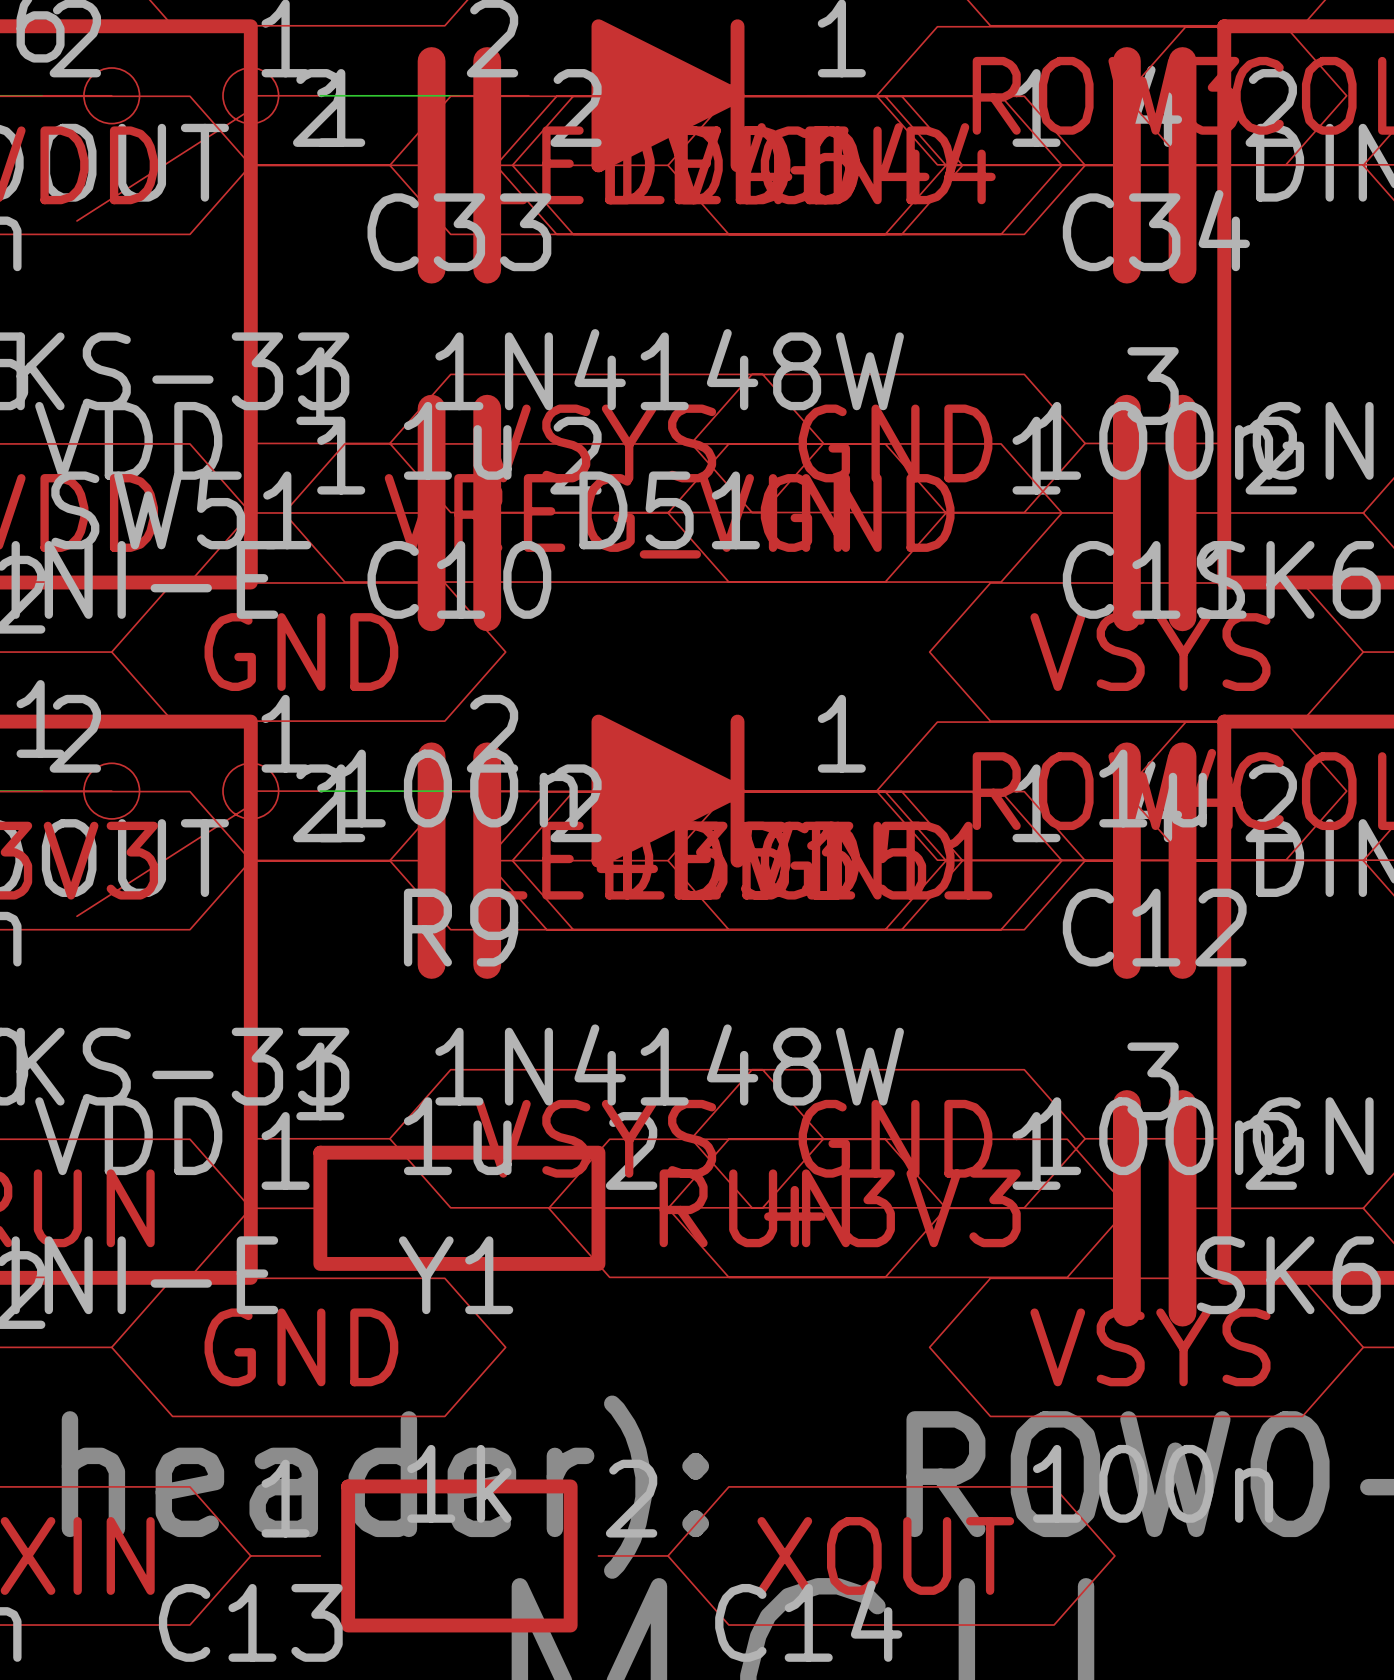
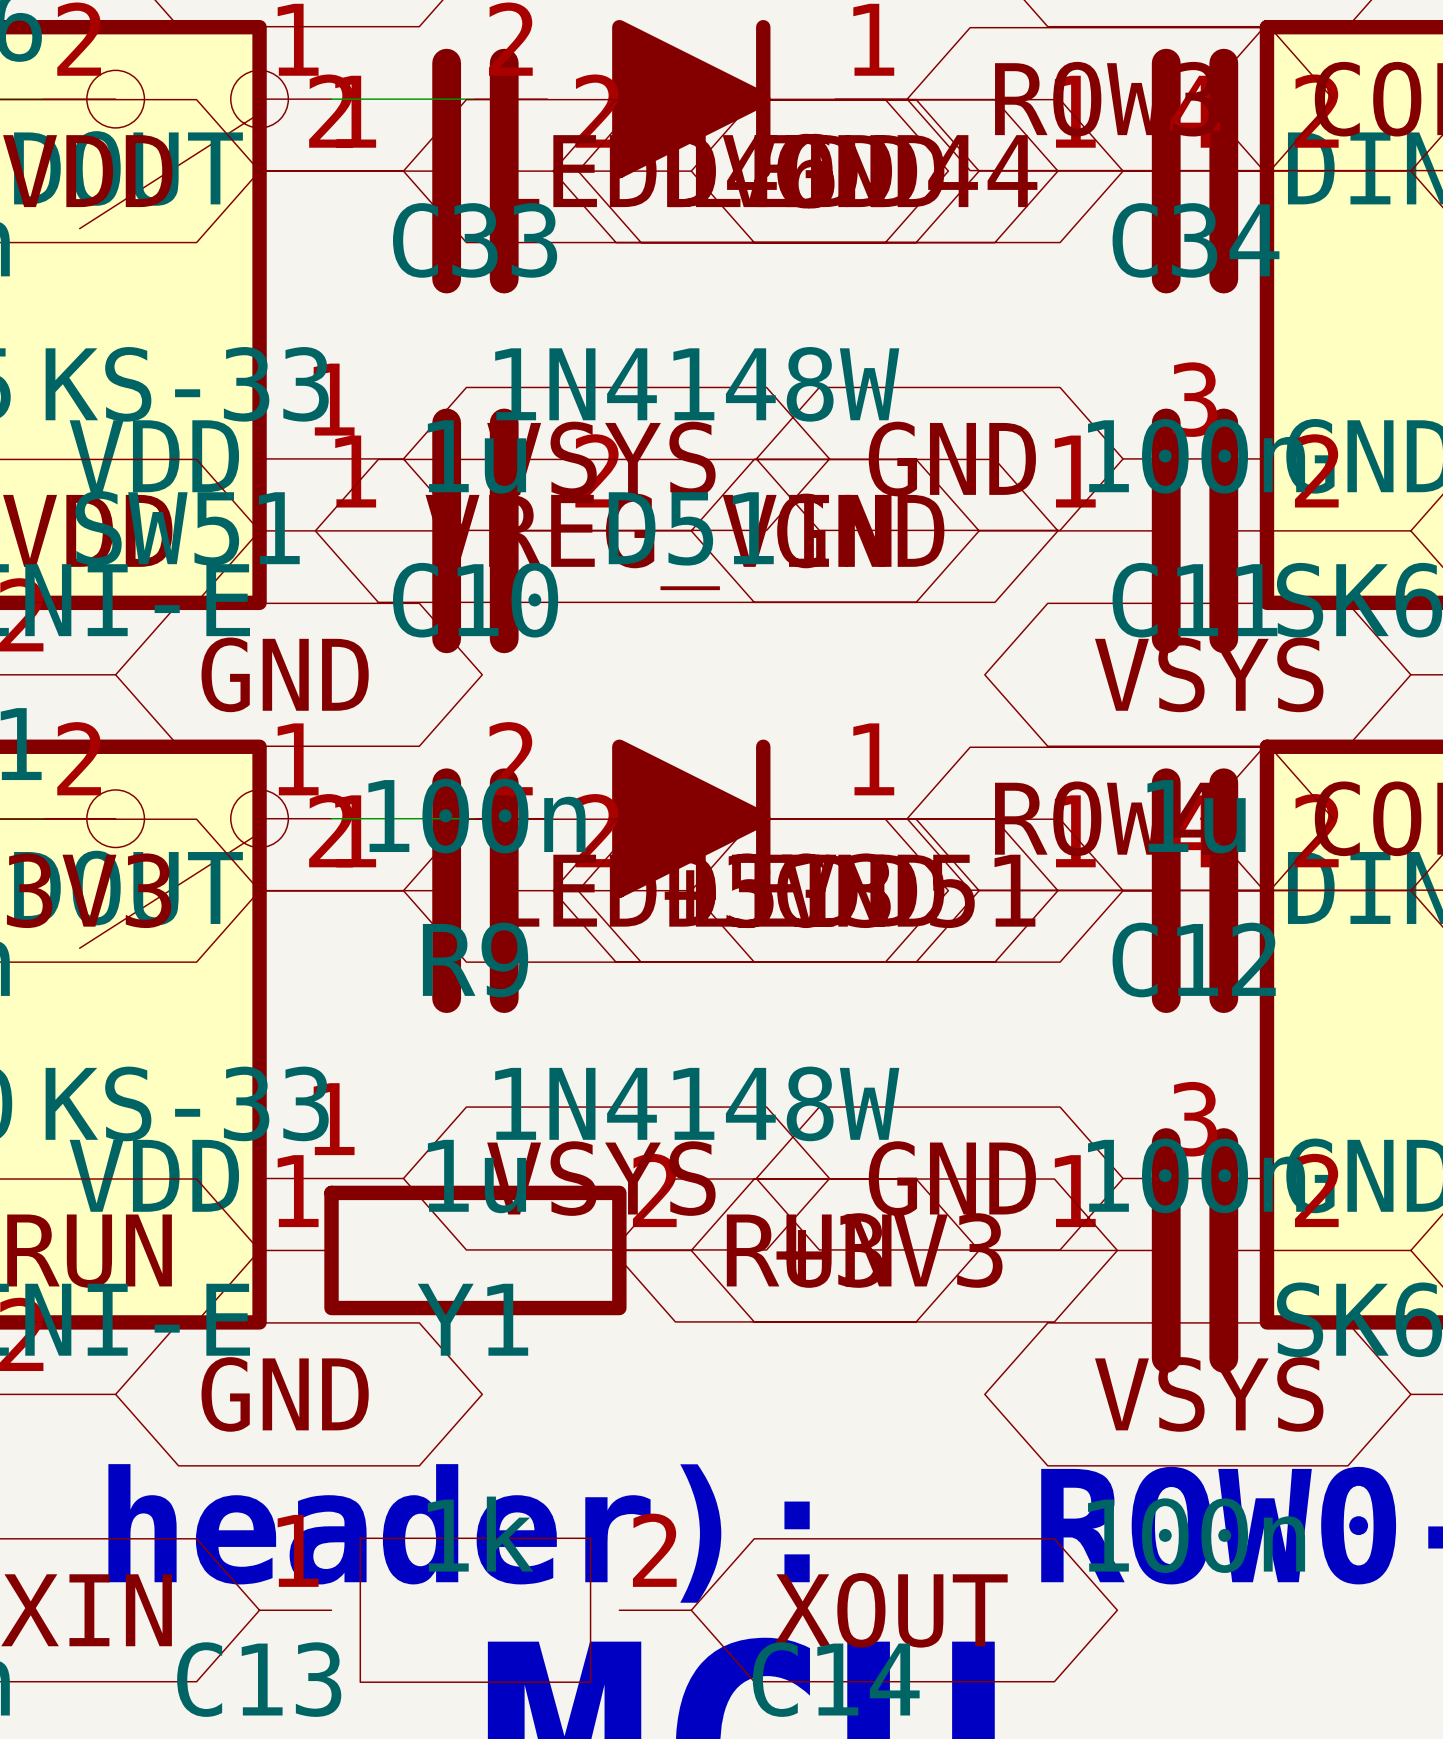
Y1 symbol: [250, 1479, 668, 1633] -> [259, 1538, 692, 1683]

